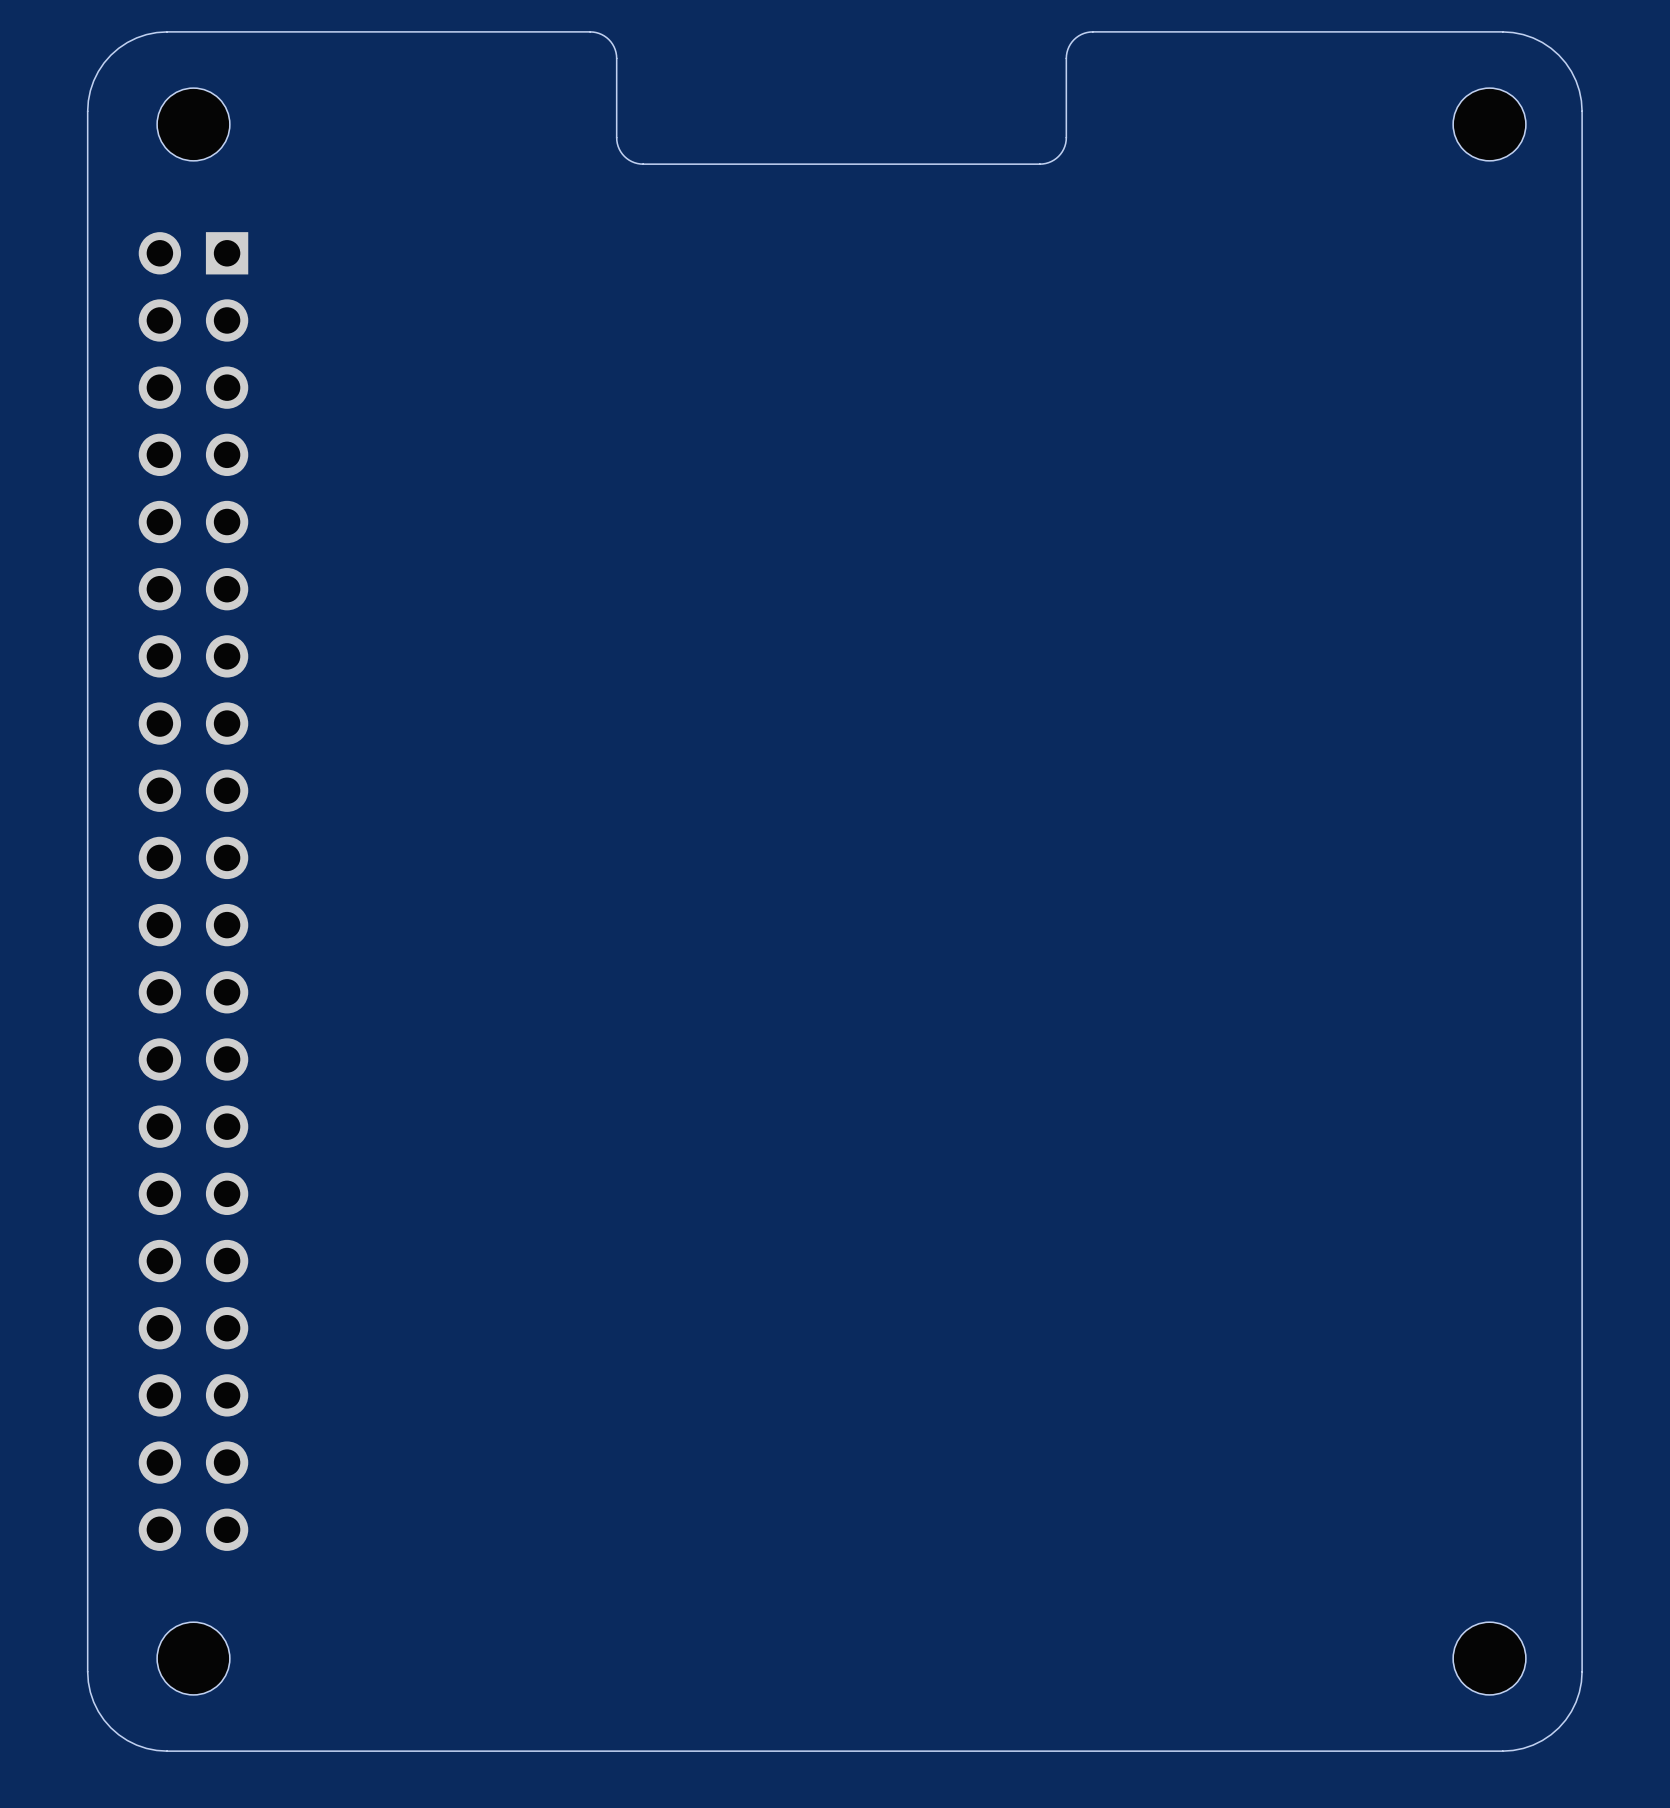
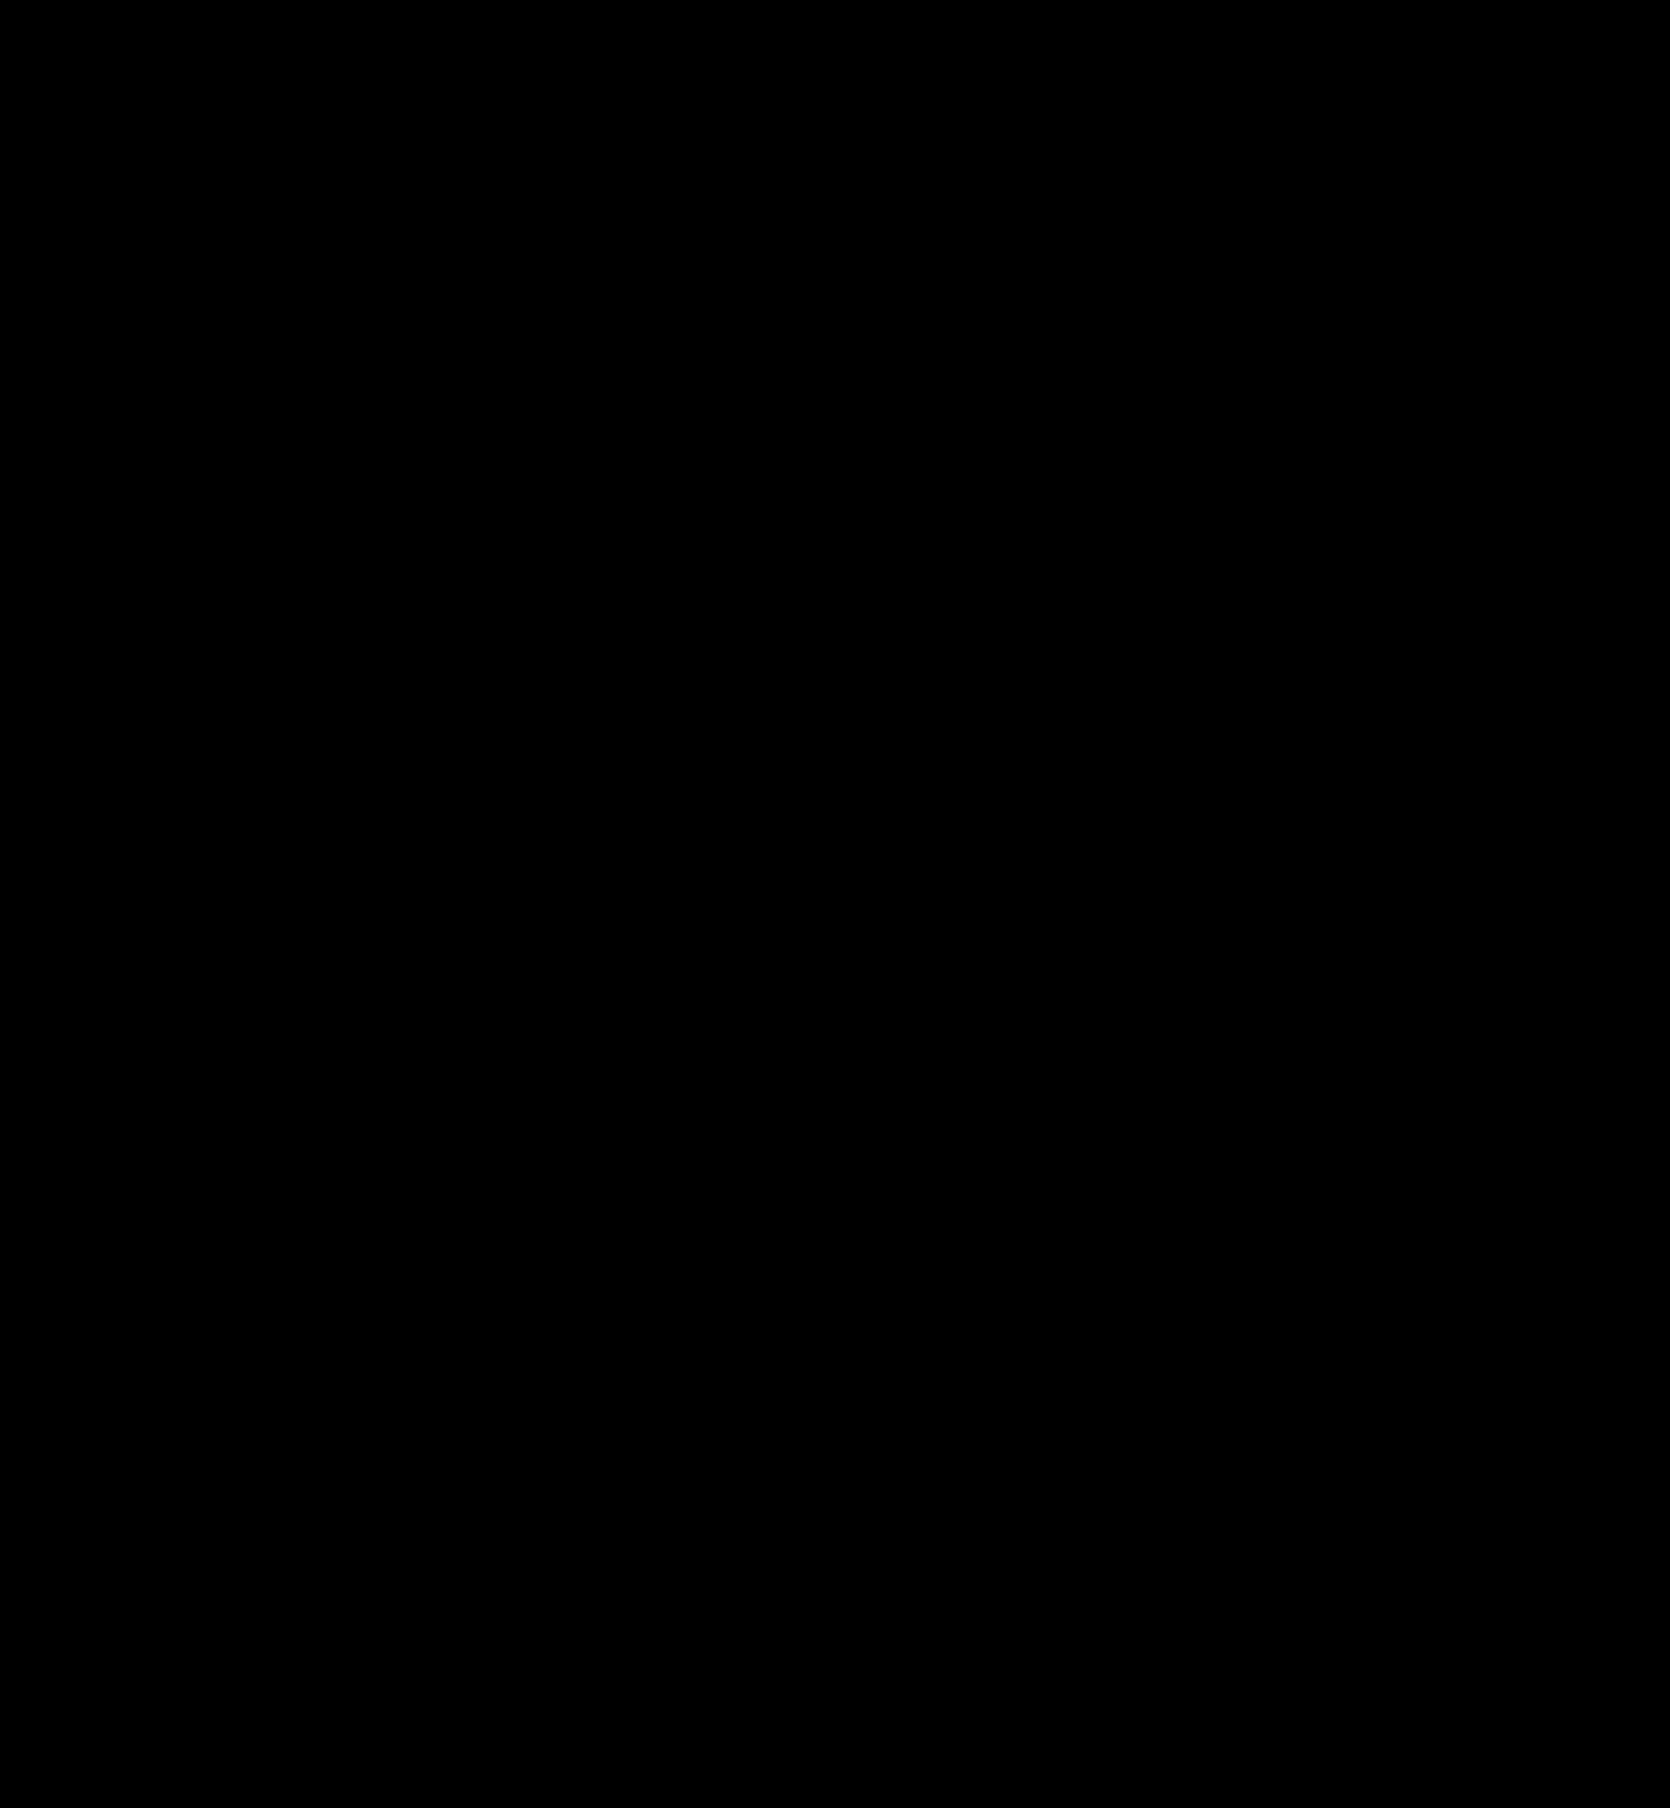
board edge: (1502, 31) (1086, 32) (1074, 39) (1066, 52) (1064, 146) (1056, 158) (1039, 164) (634, 162) (622, 154) (616, 140) (615, 49) (606, 37) (593, 32) (167, 31) (136, 37) (118, 48) (104, 62) (93, 80) (87, 111) (87, 1671) (90, 1692) (98, 1711) (118, 1734) (136, 1745) (167, 1751) (1502, 1751) (1523, 1748) (1542, 1740) (1565, 1720) (1576, 1702) (1582, 1671) (1582, 111) (1576, 80) (1558, 55) (1533, 37) (1502, 31) -> none
part: (193, 124) -> none
part: (1489, 124) -> none
part: (193, 891) -> none
part: (193, 1658) -> none
part: (1489, 1658) -> none

